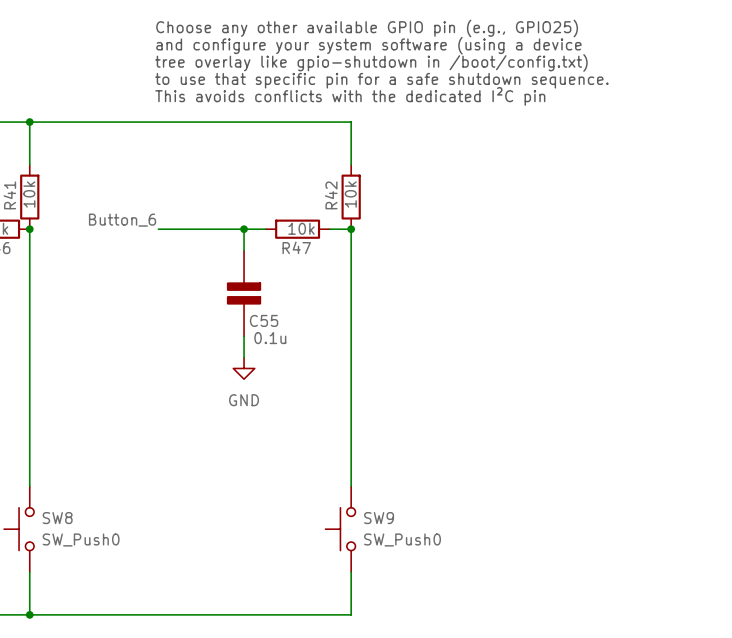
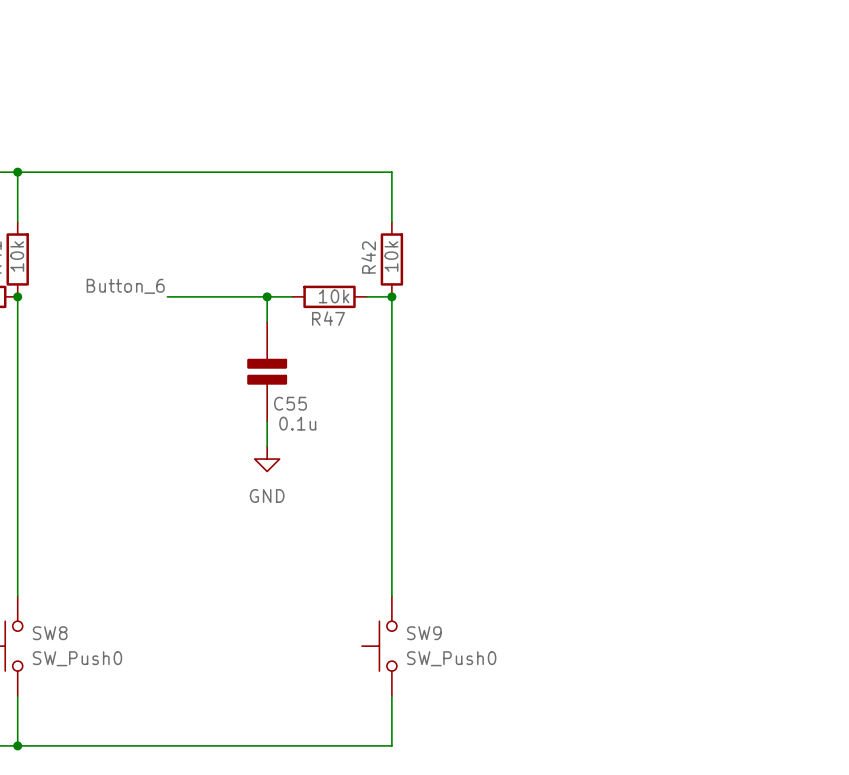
text: Choose any other available GPIO pin (e.g., GPIO25) (367, 28) -> none
text: and configure your system software (using a device (368, 45) -> none
text: tree overlay like gpio-shutdown in /boot/config.txt) (371, 62) -> none
text: to use that specific pin for a safe shutdown sequence. (381, 80) -> none
text: This avoids conflicts with the dedicated I²C pin (350, 96) -> none

